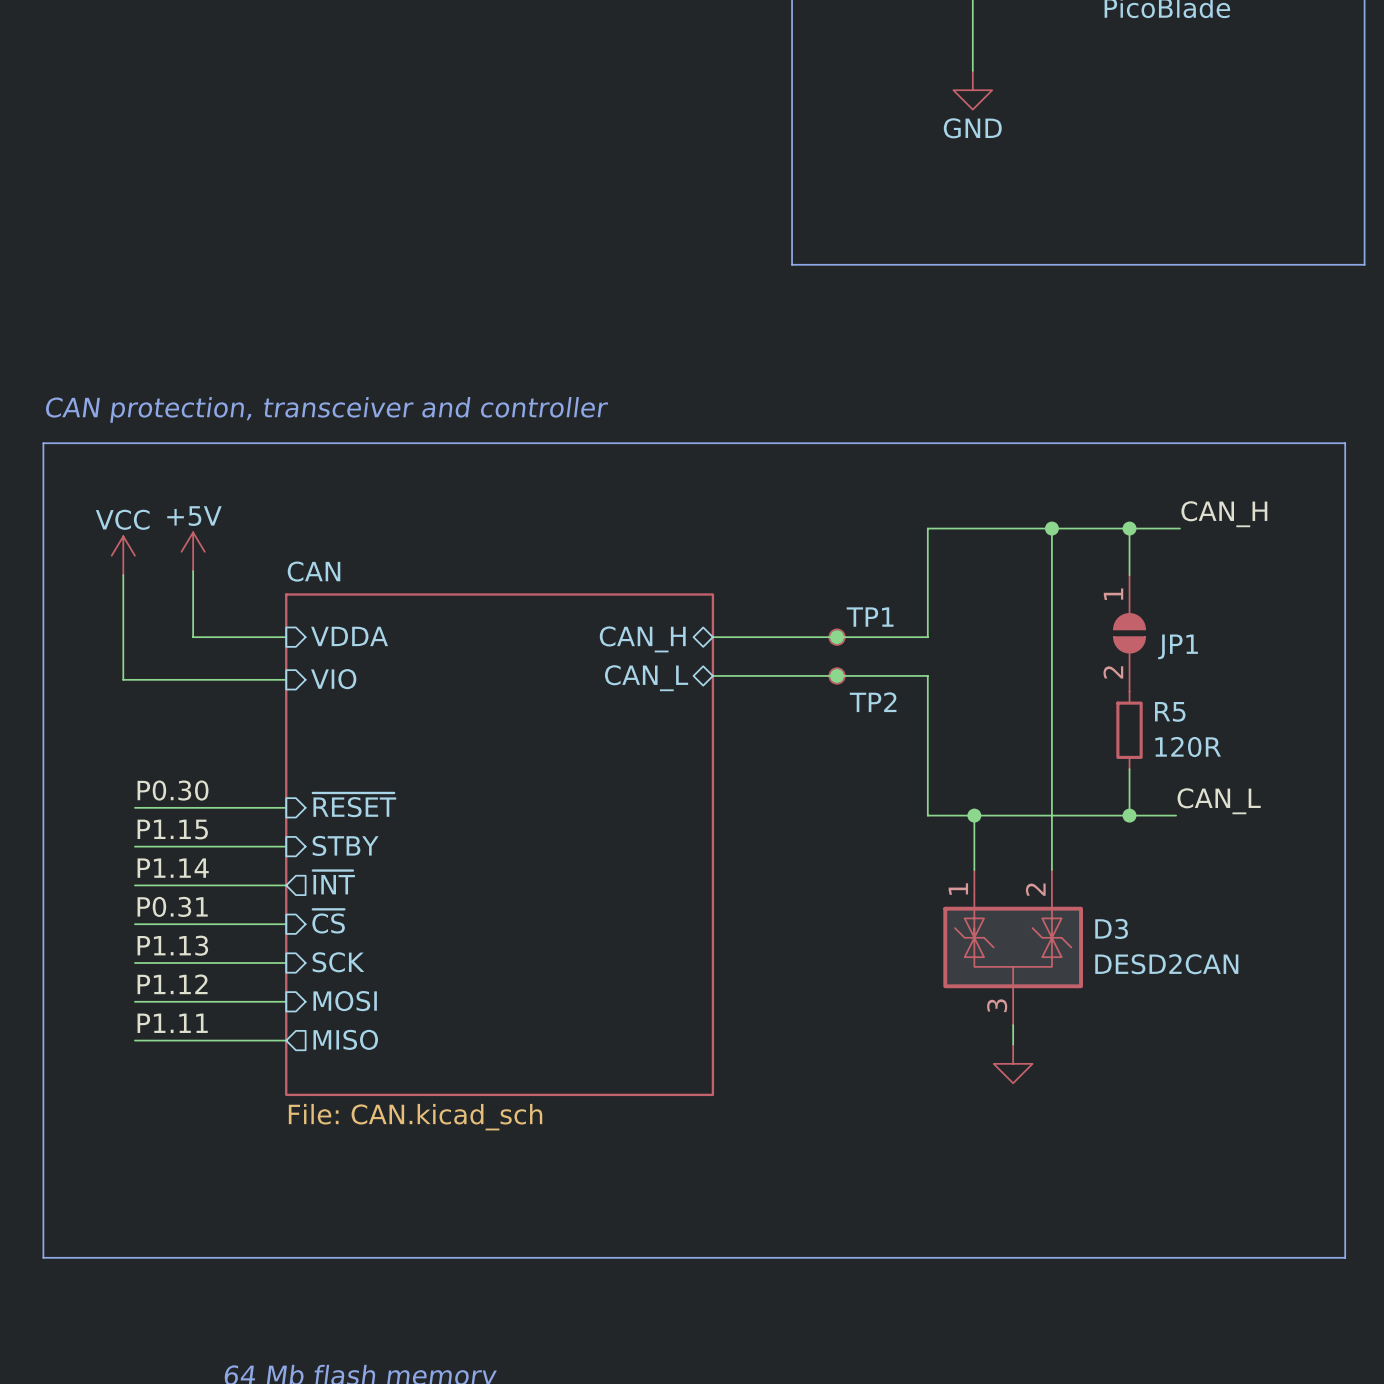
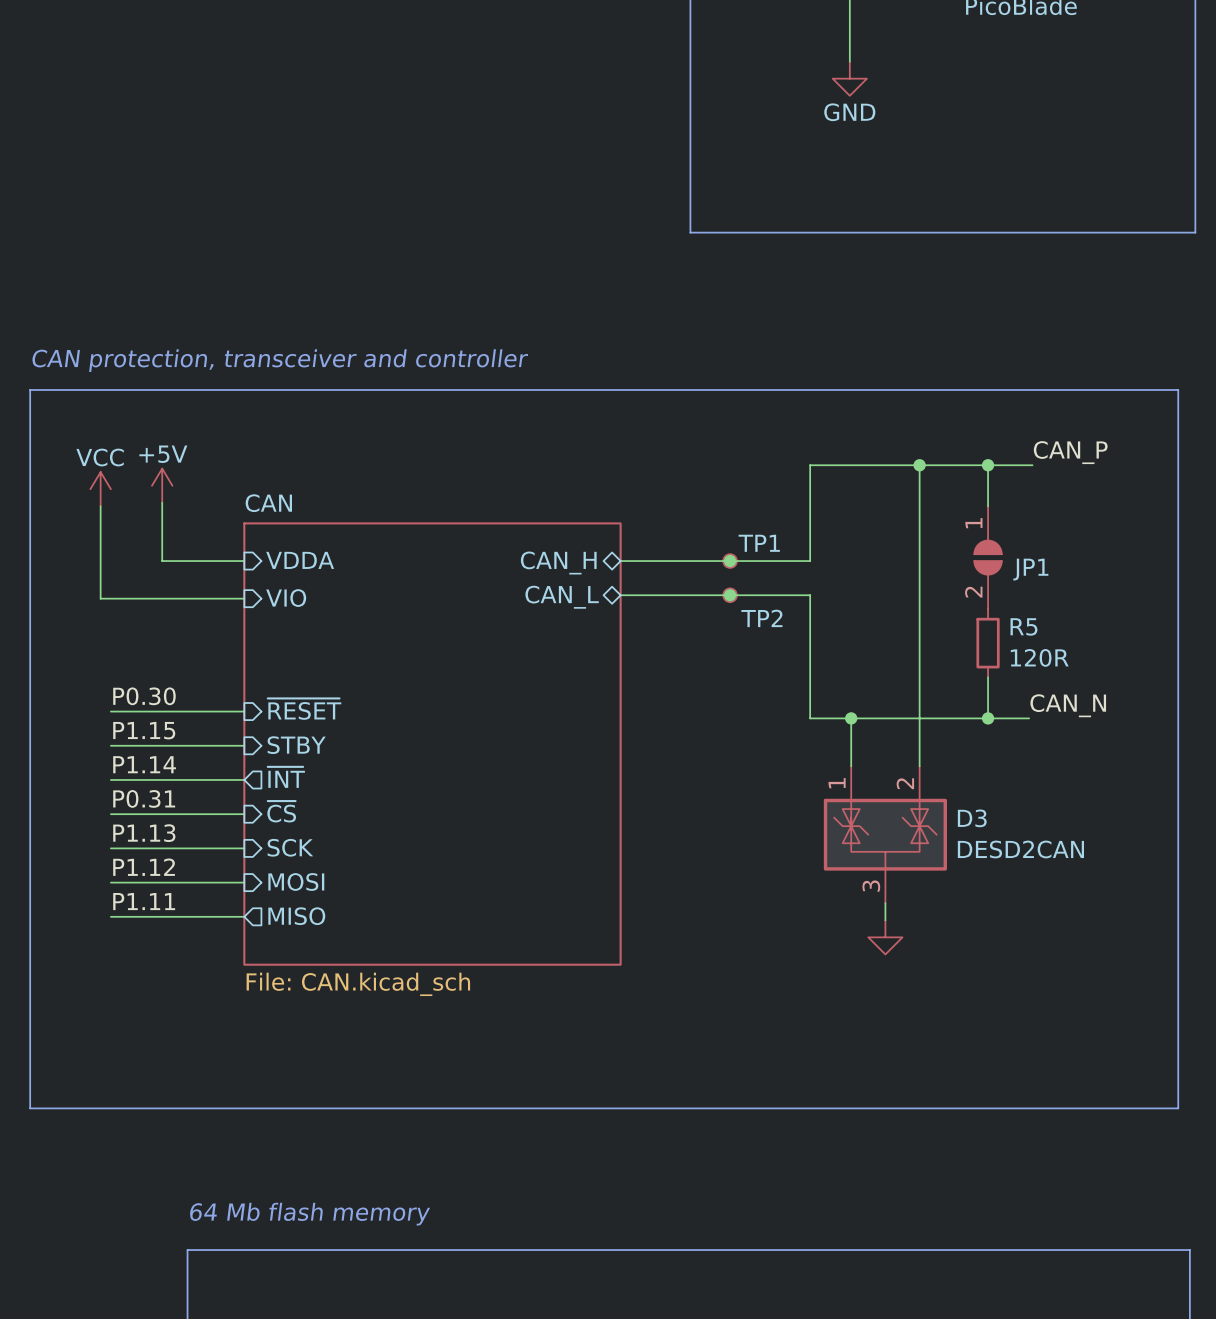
label: CAN_H (1224, 514) -> CAN_P (1070, 452)
label: CAN_L (1219, 801) -> CAN_N (1068, 705)

